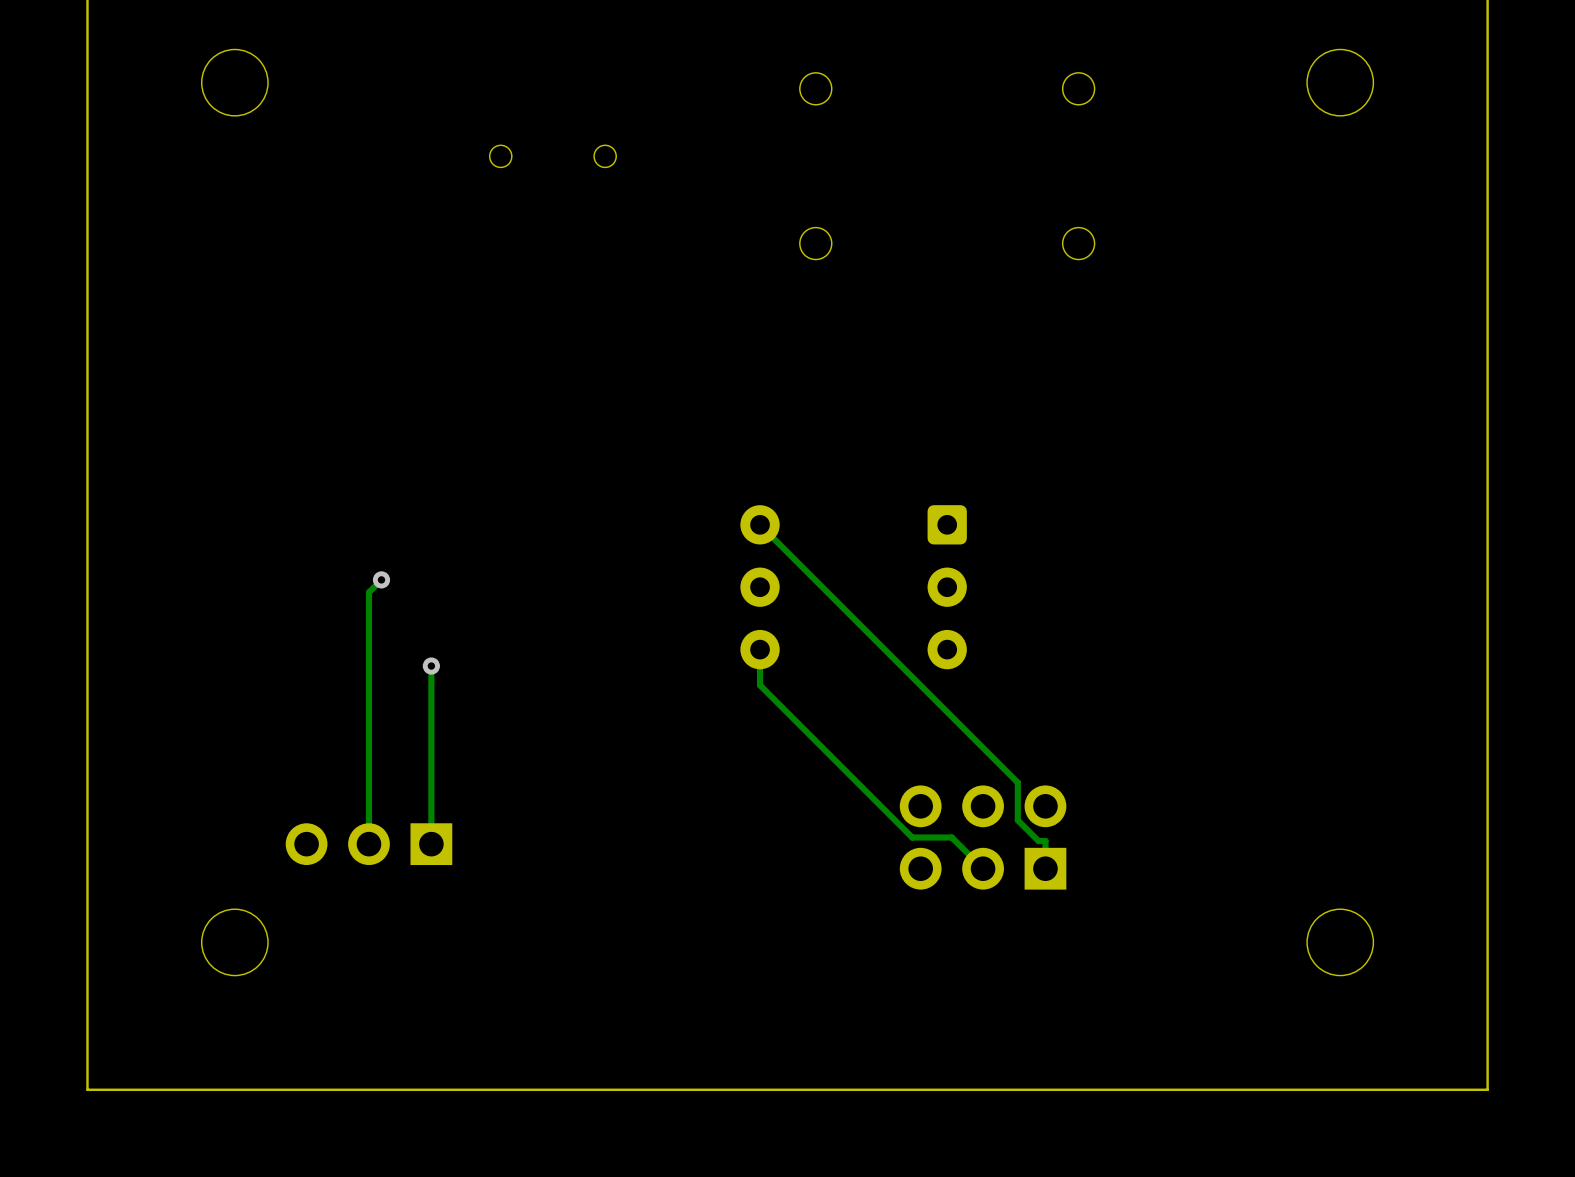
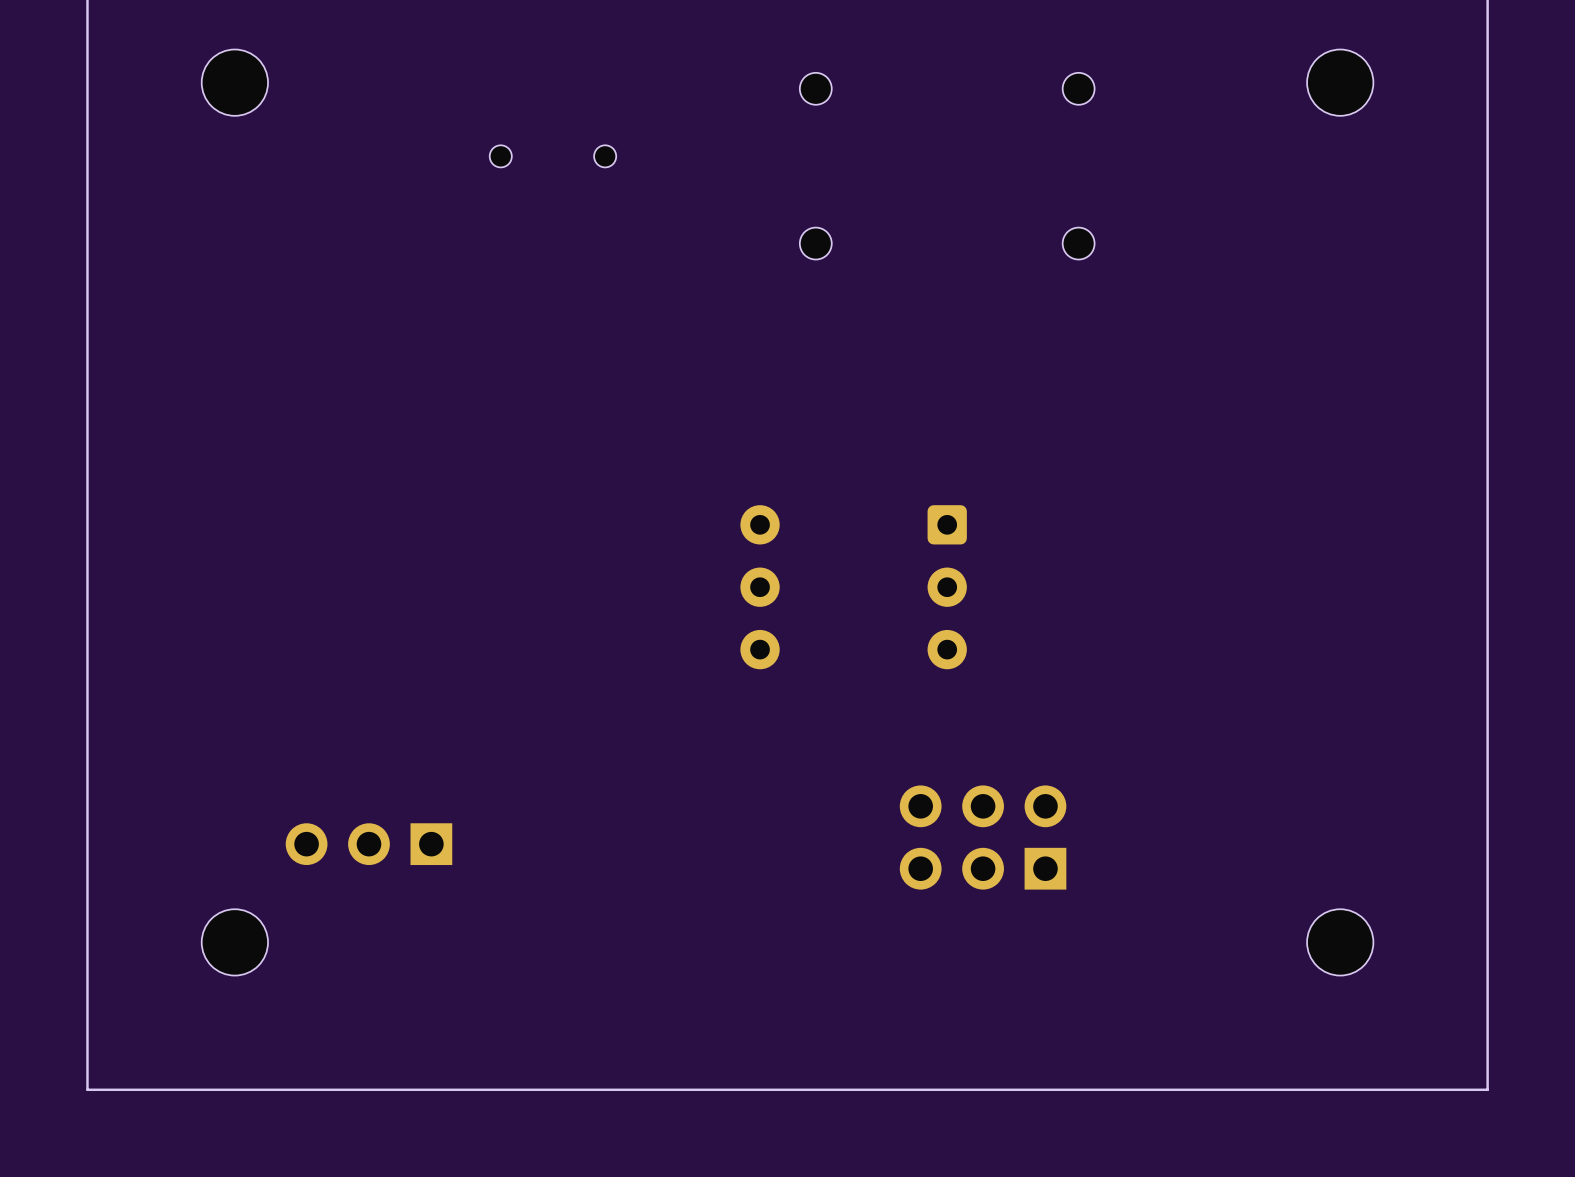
track: (760, 524) (1017, 782) (1017, 820) (1038, 841) (1045, 841) (1045, 868) -> none
track: (381, 579) (368, 592) (368, 844) -> none
via: (381, 579) -> none
track: (760, 649) (760, 685) (912, 837) (951, 837) (983, 868) -> none
track: (431, 666) (431, 844) -> none
via: (431, 666) -> none

